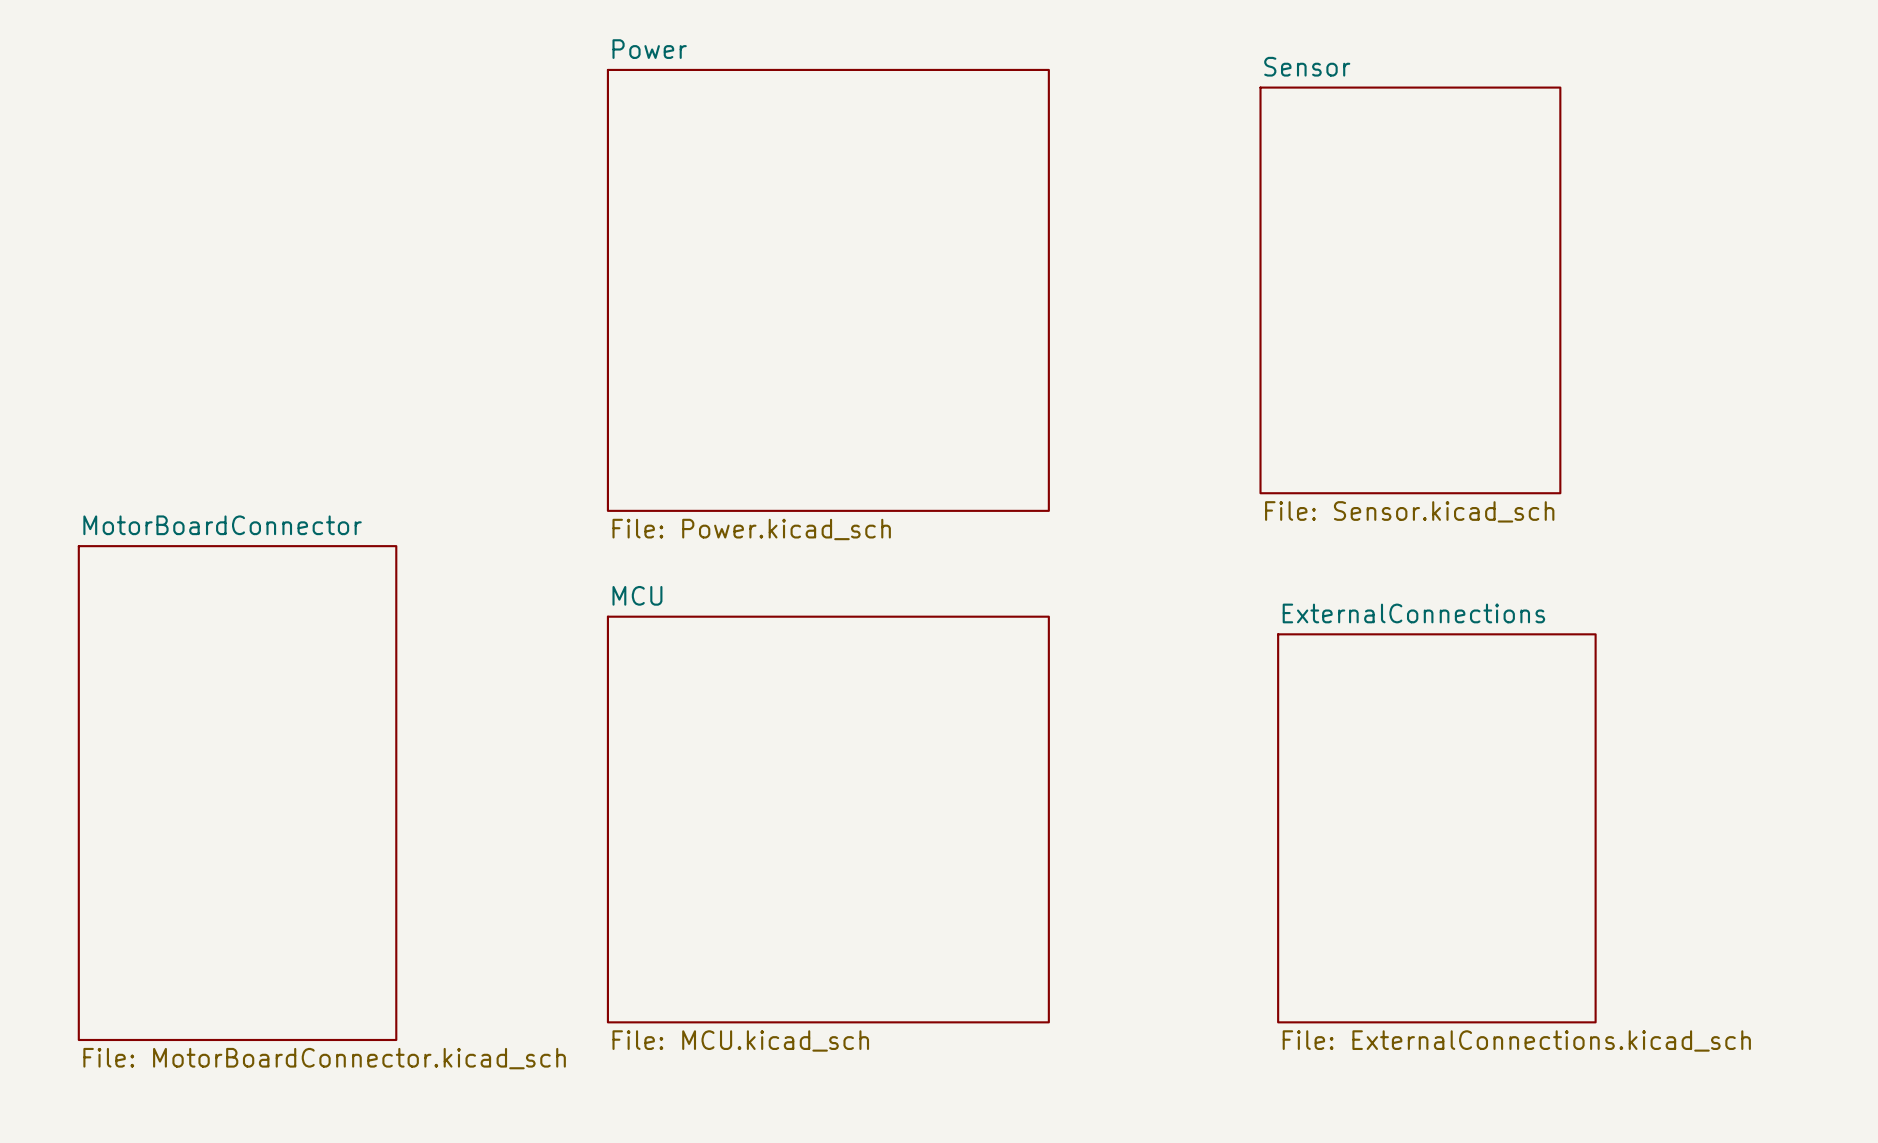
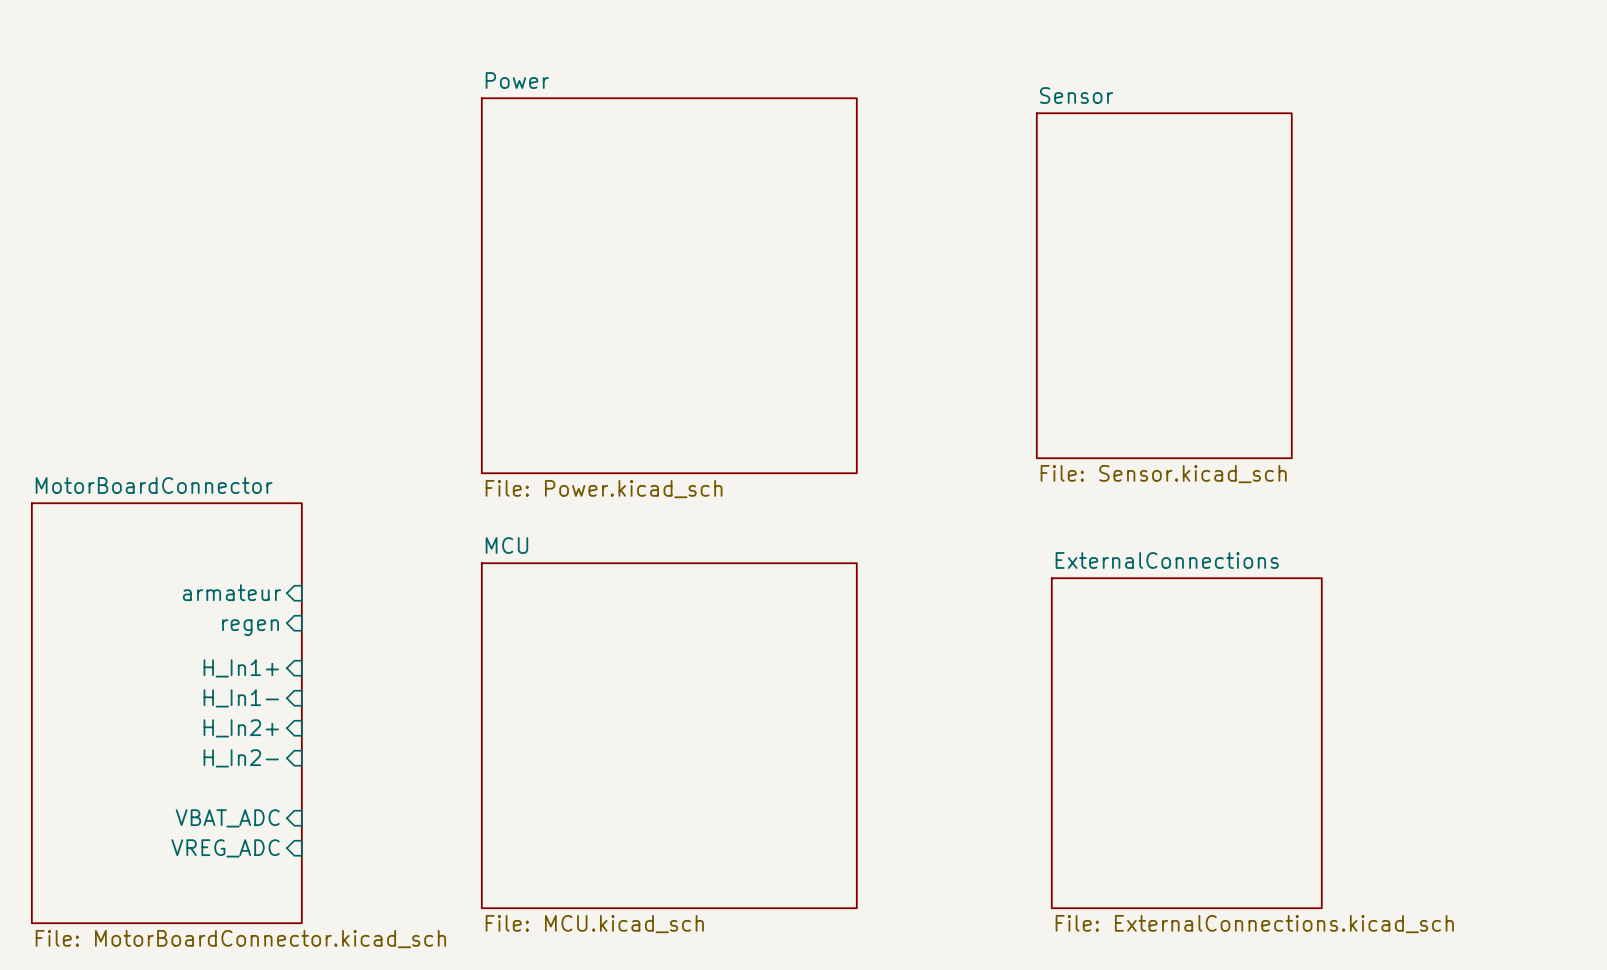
sheet pin: none -> armateur (231, 592)
sheet pin: none -> regen (250, 627)
sheet pin: none -> H_In1+ (241, 668)
sheet pin: none -> H_In1- (241, 698)
sheet pin: none -> H_In2+ (241, 728)
sheet pin: none -> H_In2- (241, 758)
sheet pin: none -> VBAT_ADC (227, 818)
sheet pin: none -> VREG_ADC (225, 848)

